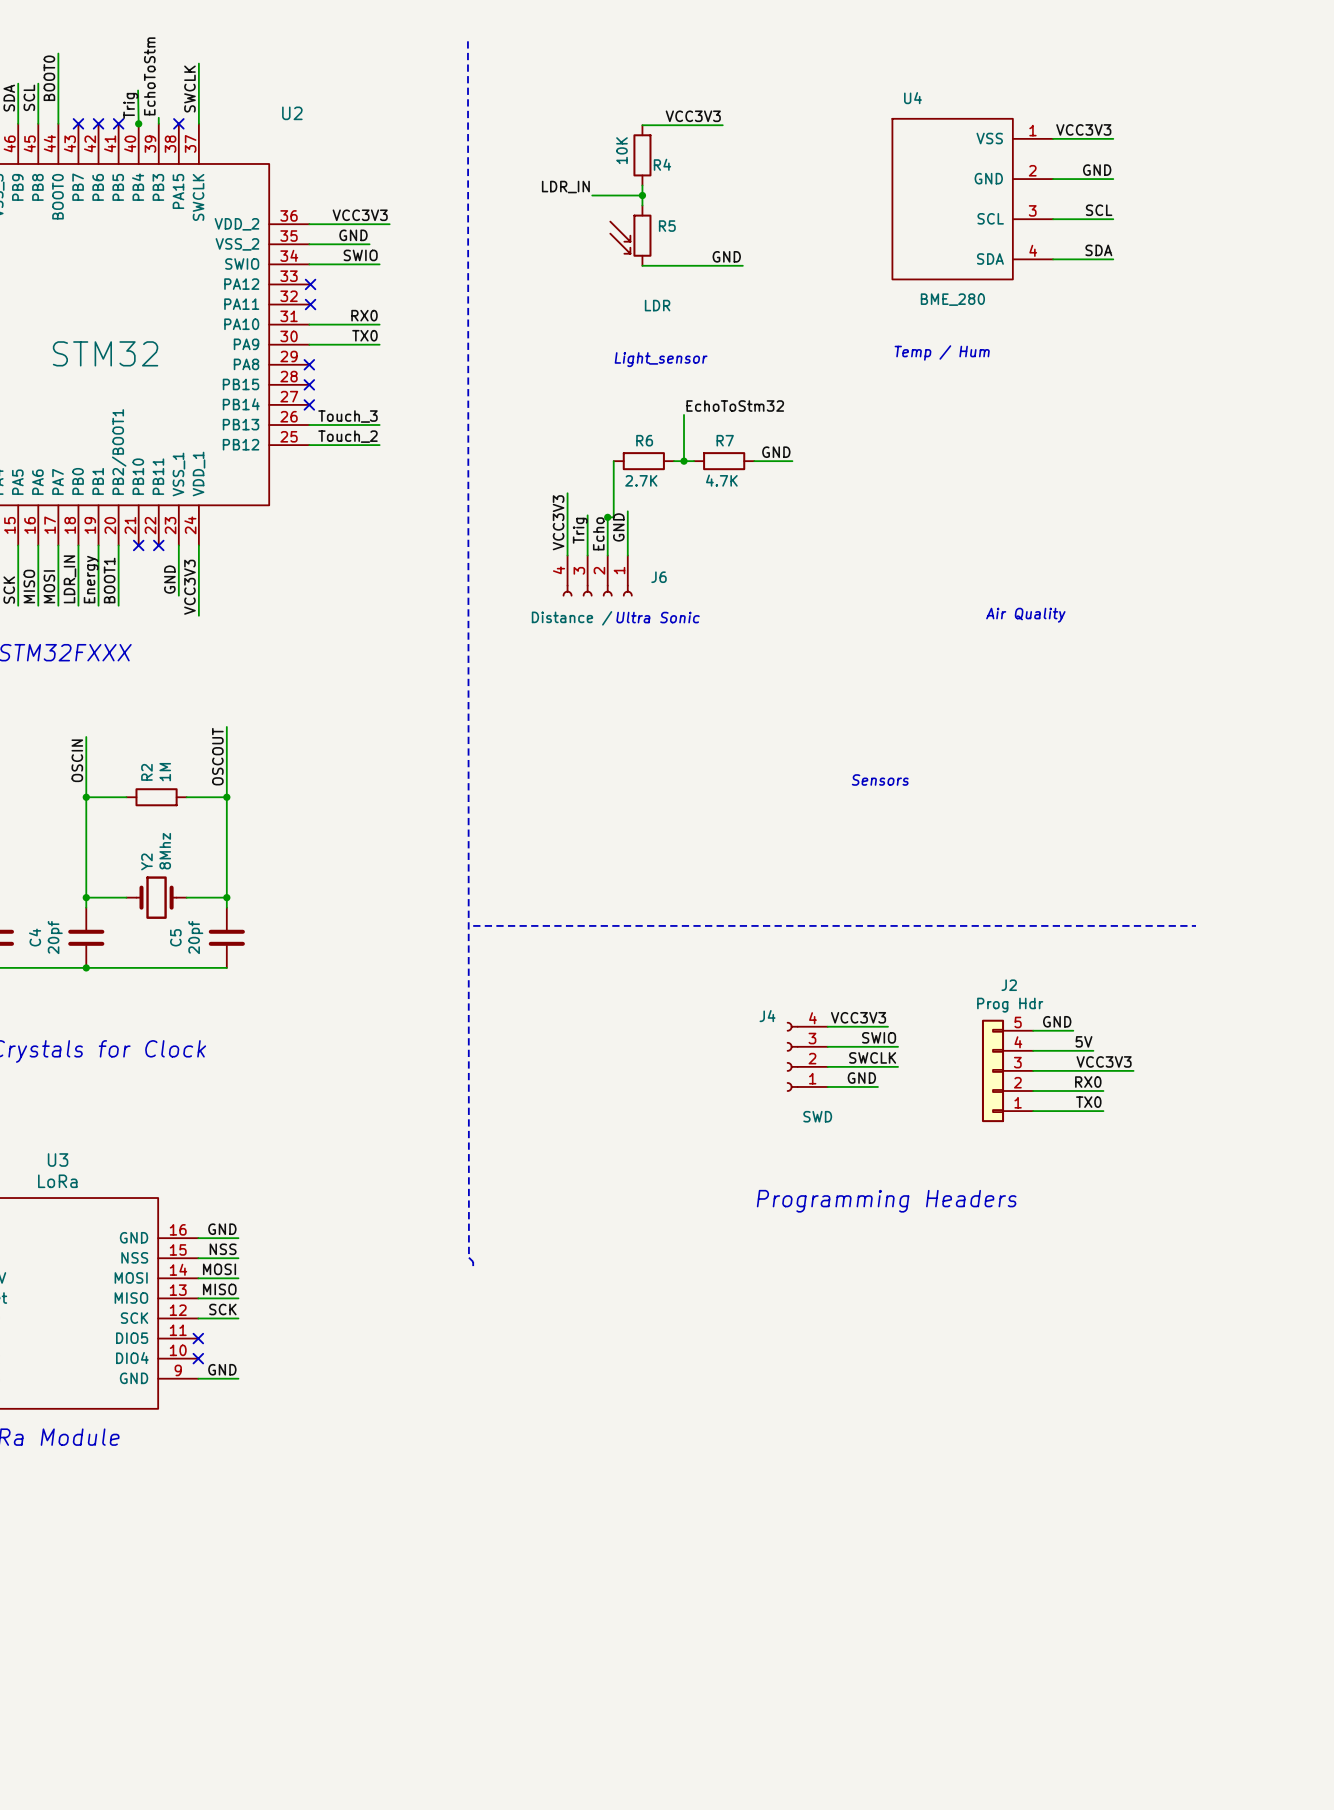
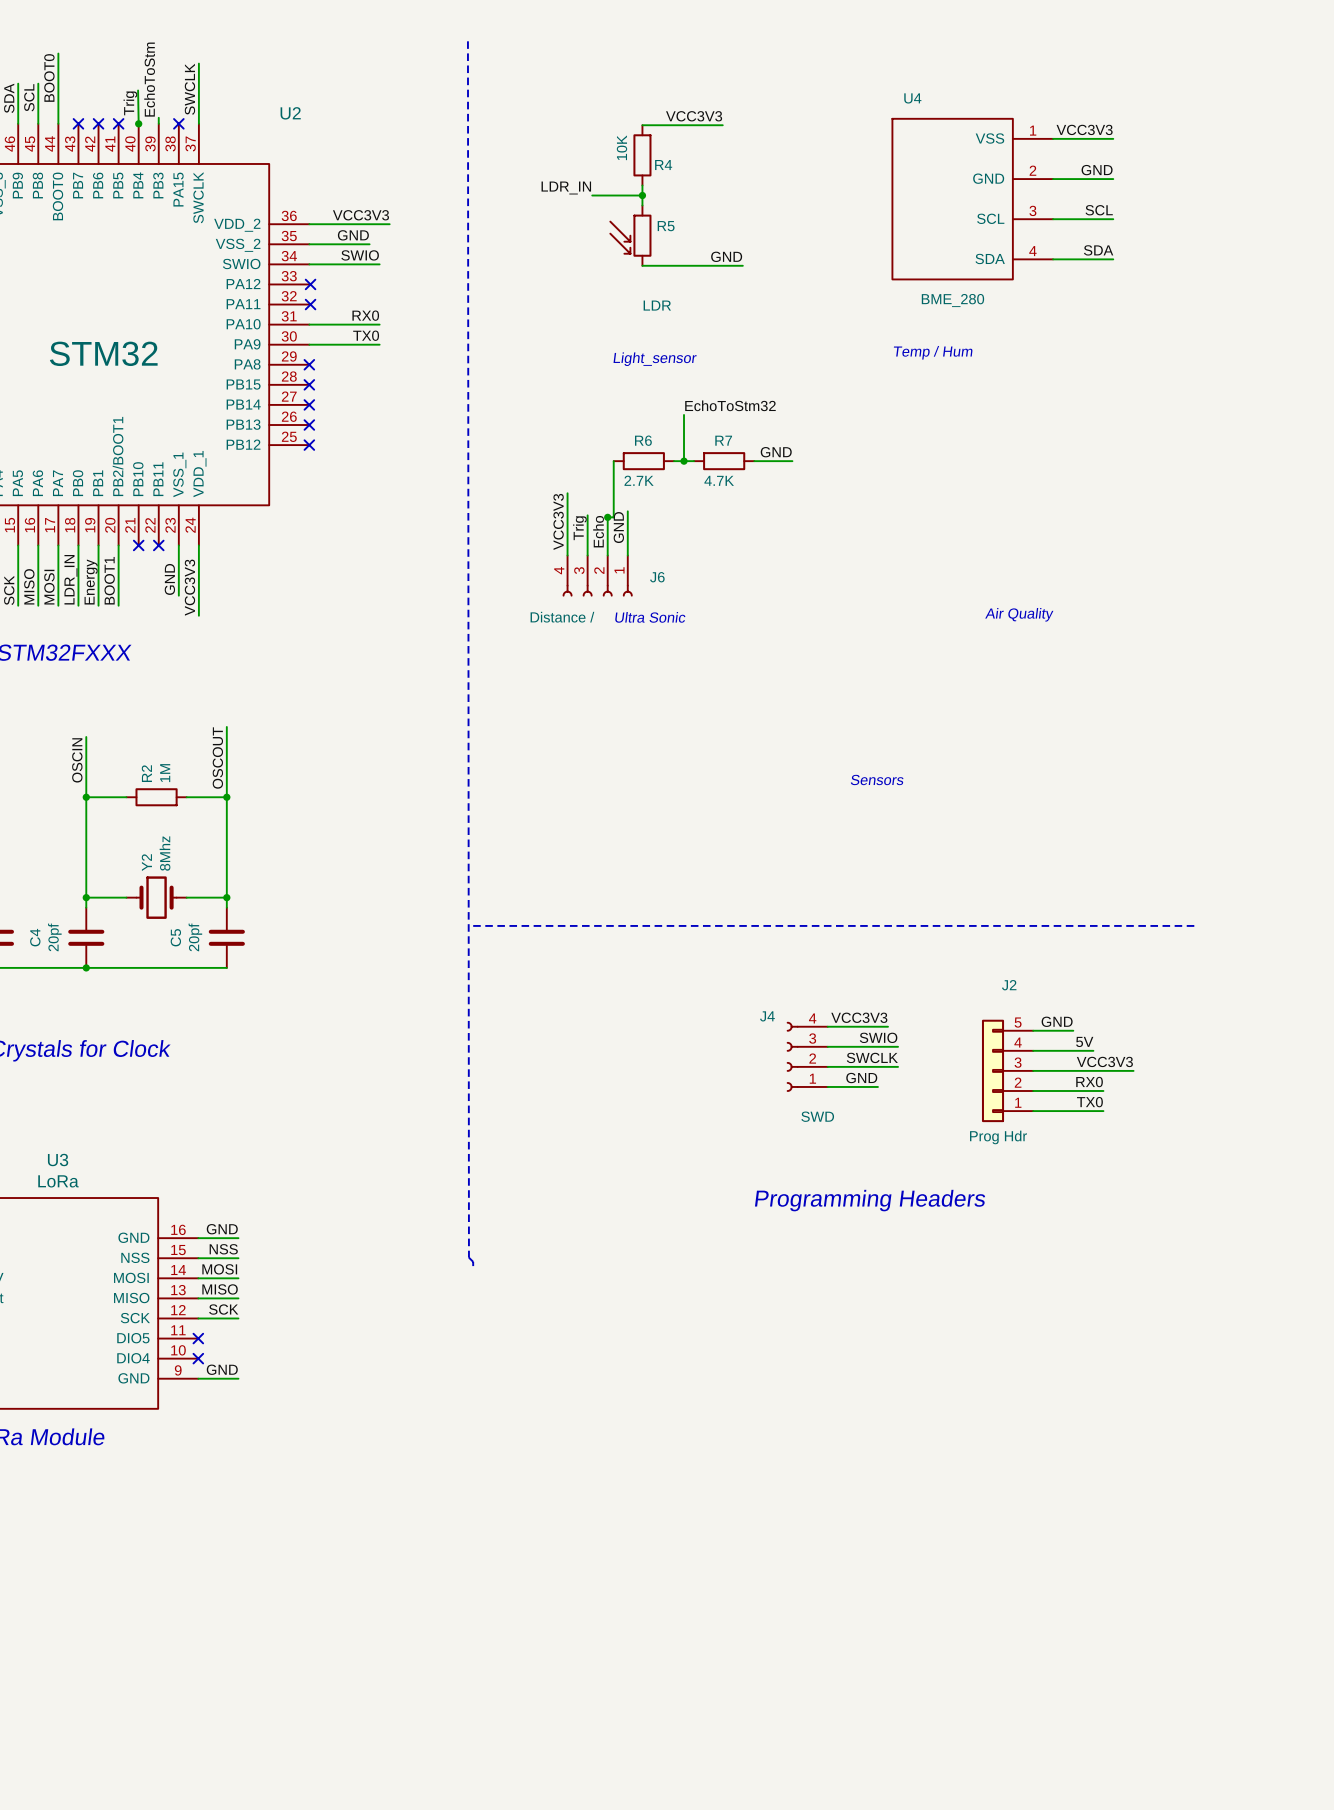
label: Touch_3 (347, 416) -> none
wire: (309, 425) (379, 425) -> none
no-connect mark: none -> (309, 425)
label: Touch_2 (347, 436) -> none
wire: (309, 445) (379, 445) -> none
no-connect mark: none -> (309, 445)
J2 value position: Prog Hdr (1010, 1005) -> Prog Hdr (998, 1137)

